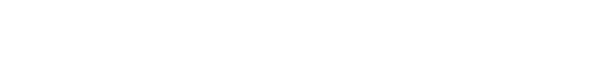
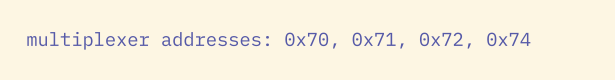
text: none -> multiplexer addresses: 0x70, 0x71, 0x72, 0x74 (278, 40)

